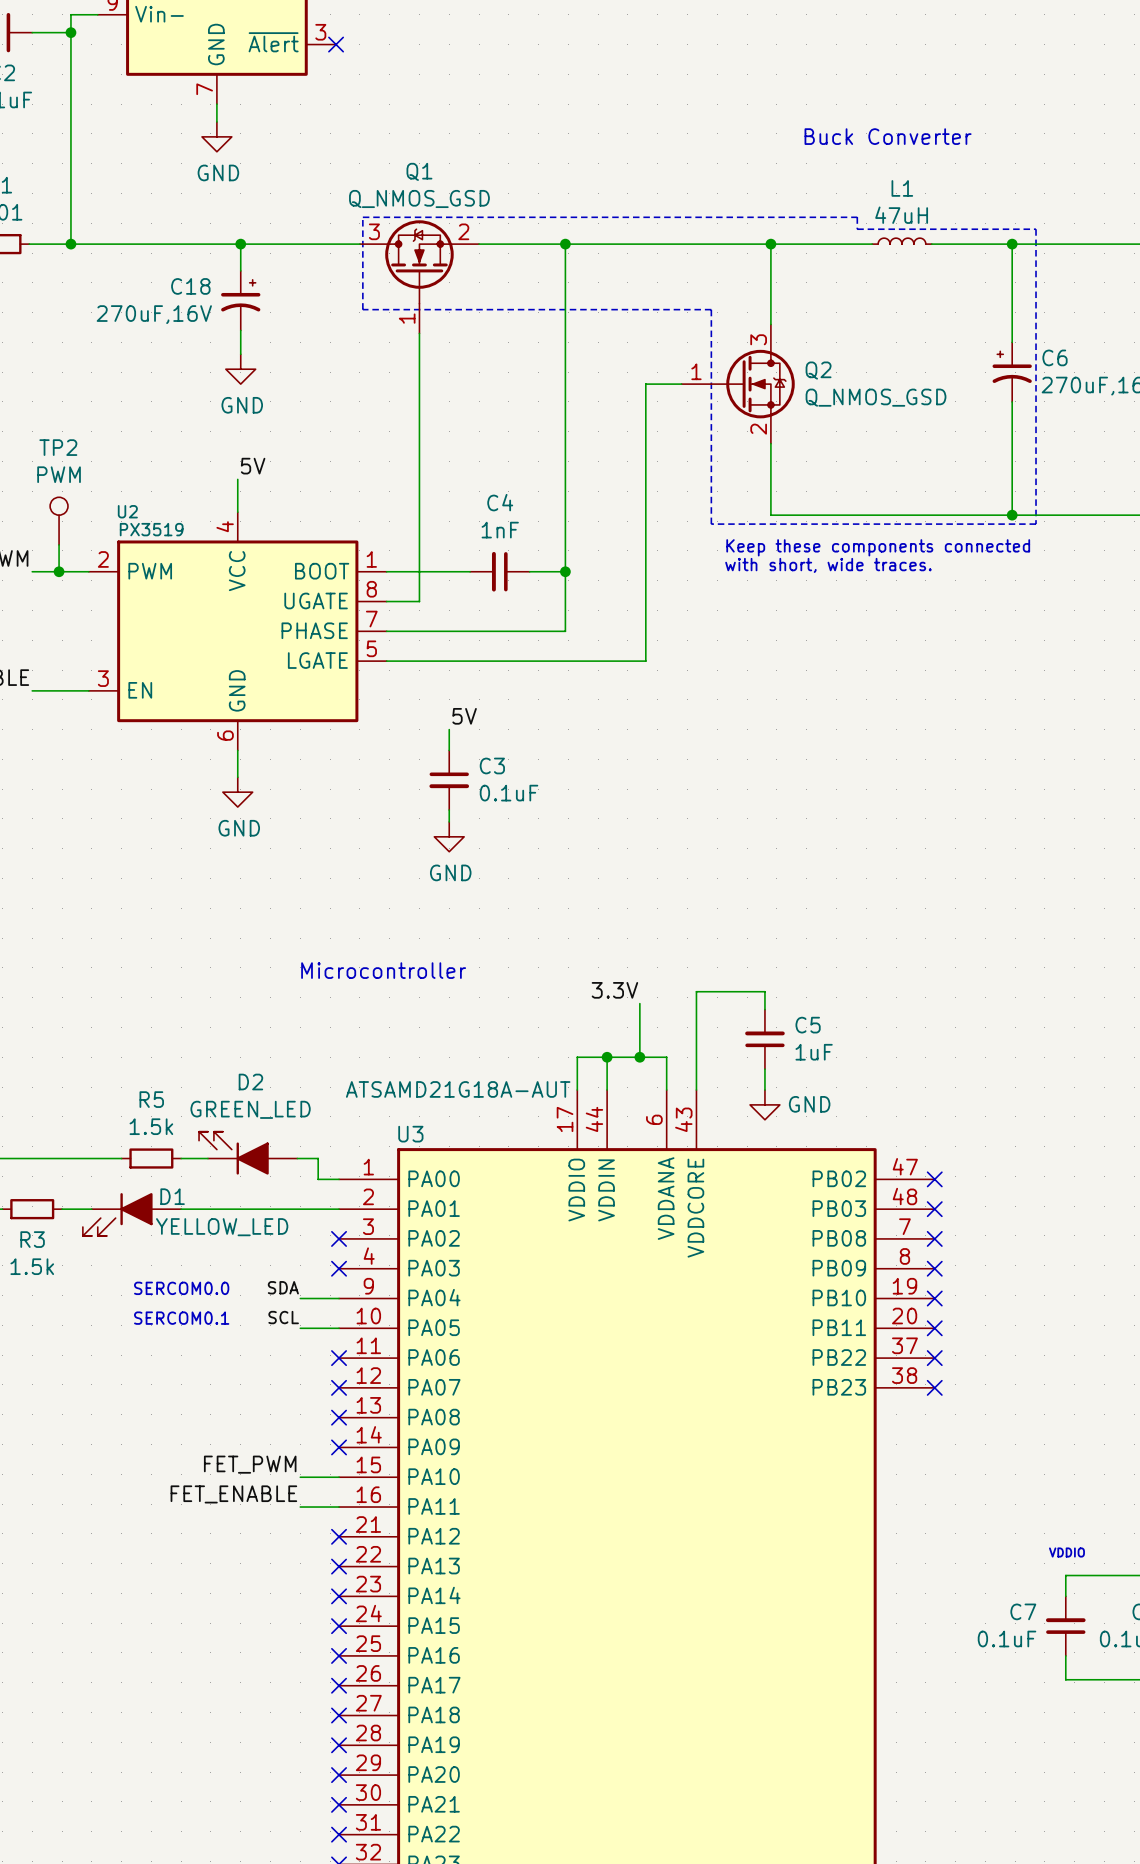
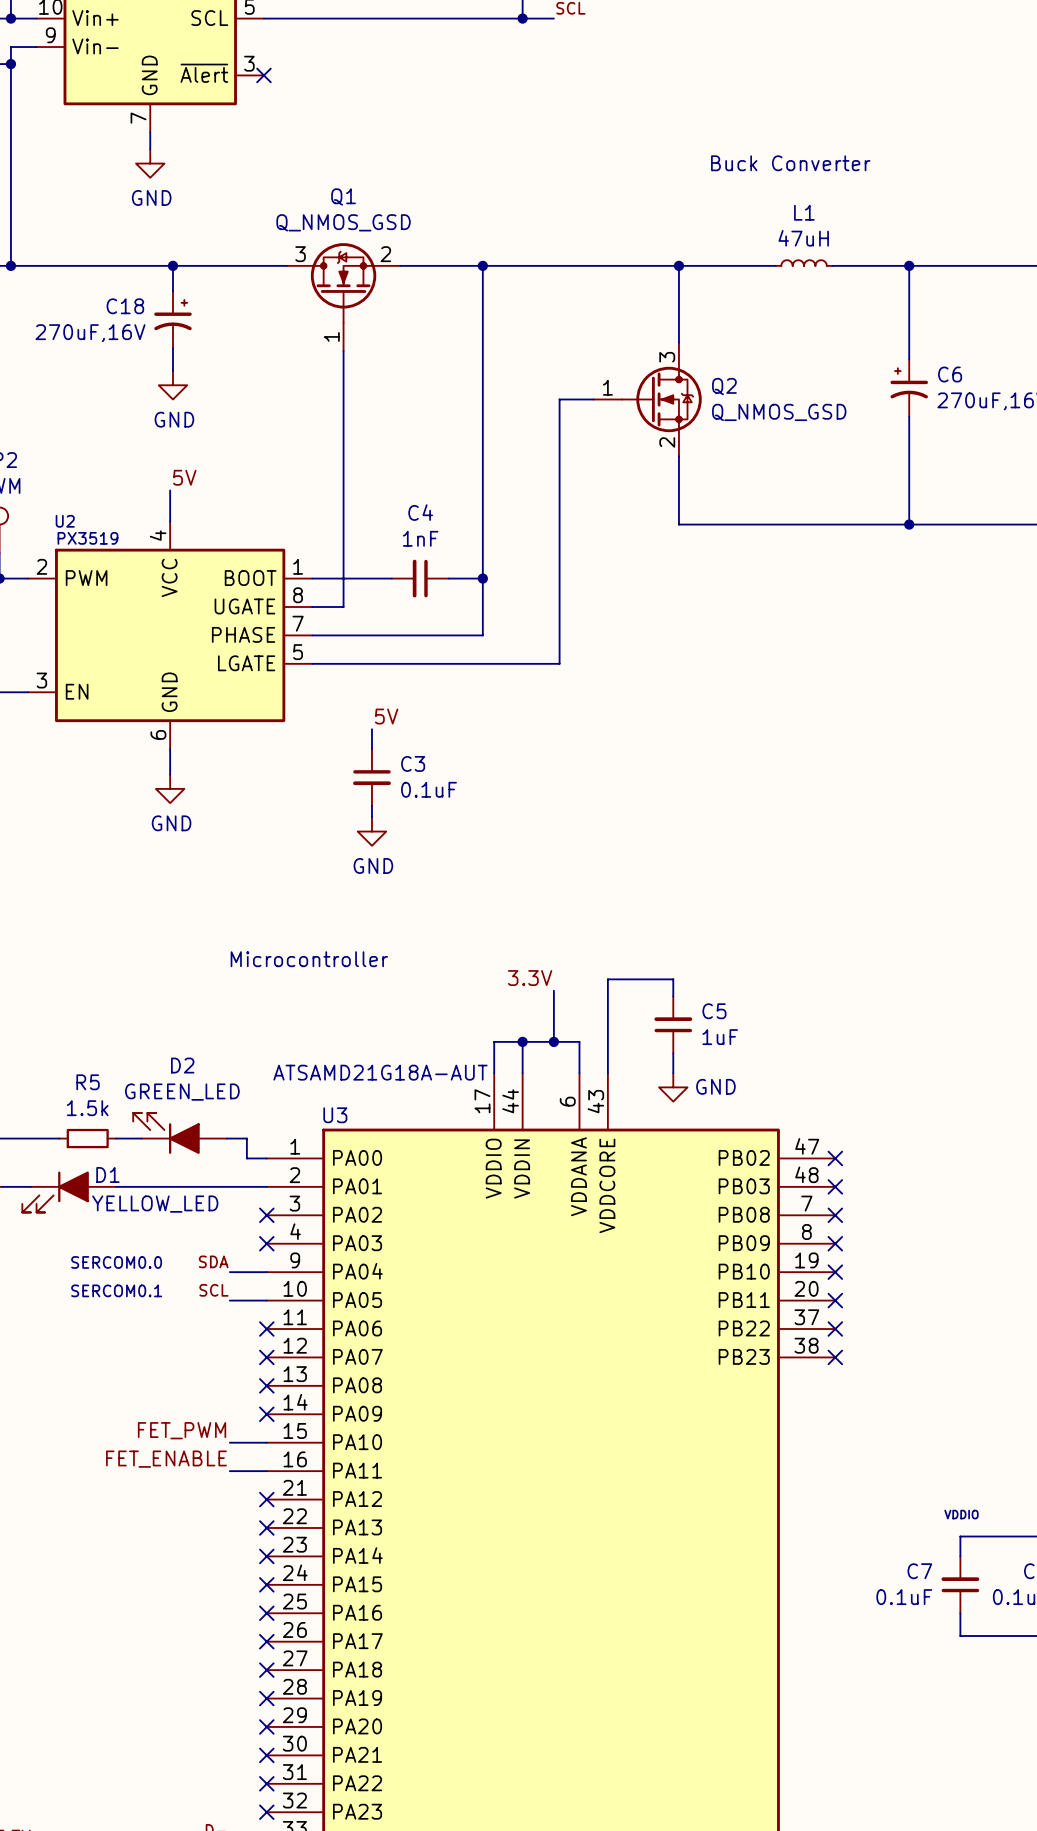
line: (362, 217) (362, 309) (711, 309) (711, 524) (1036, 524) (1036, 229) (857, 229) (857, 217) (362, 217) -> none
text: Keep these components connected (878, 547) -> none
text: with short, wide traces. (828, 565) -> none

